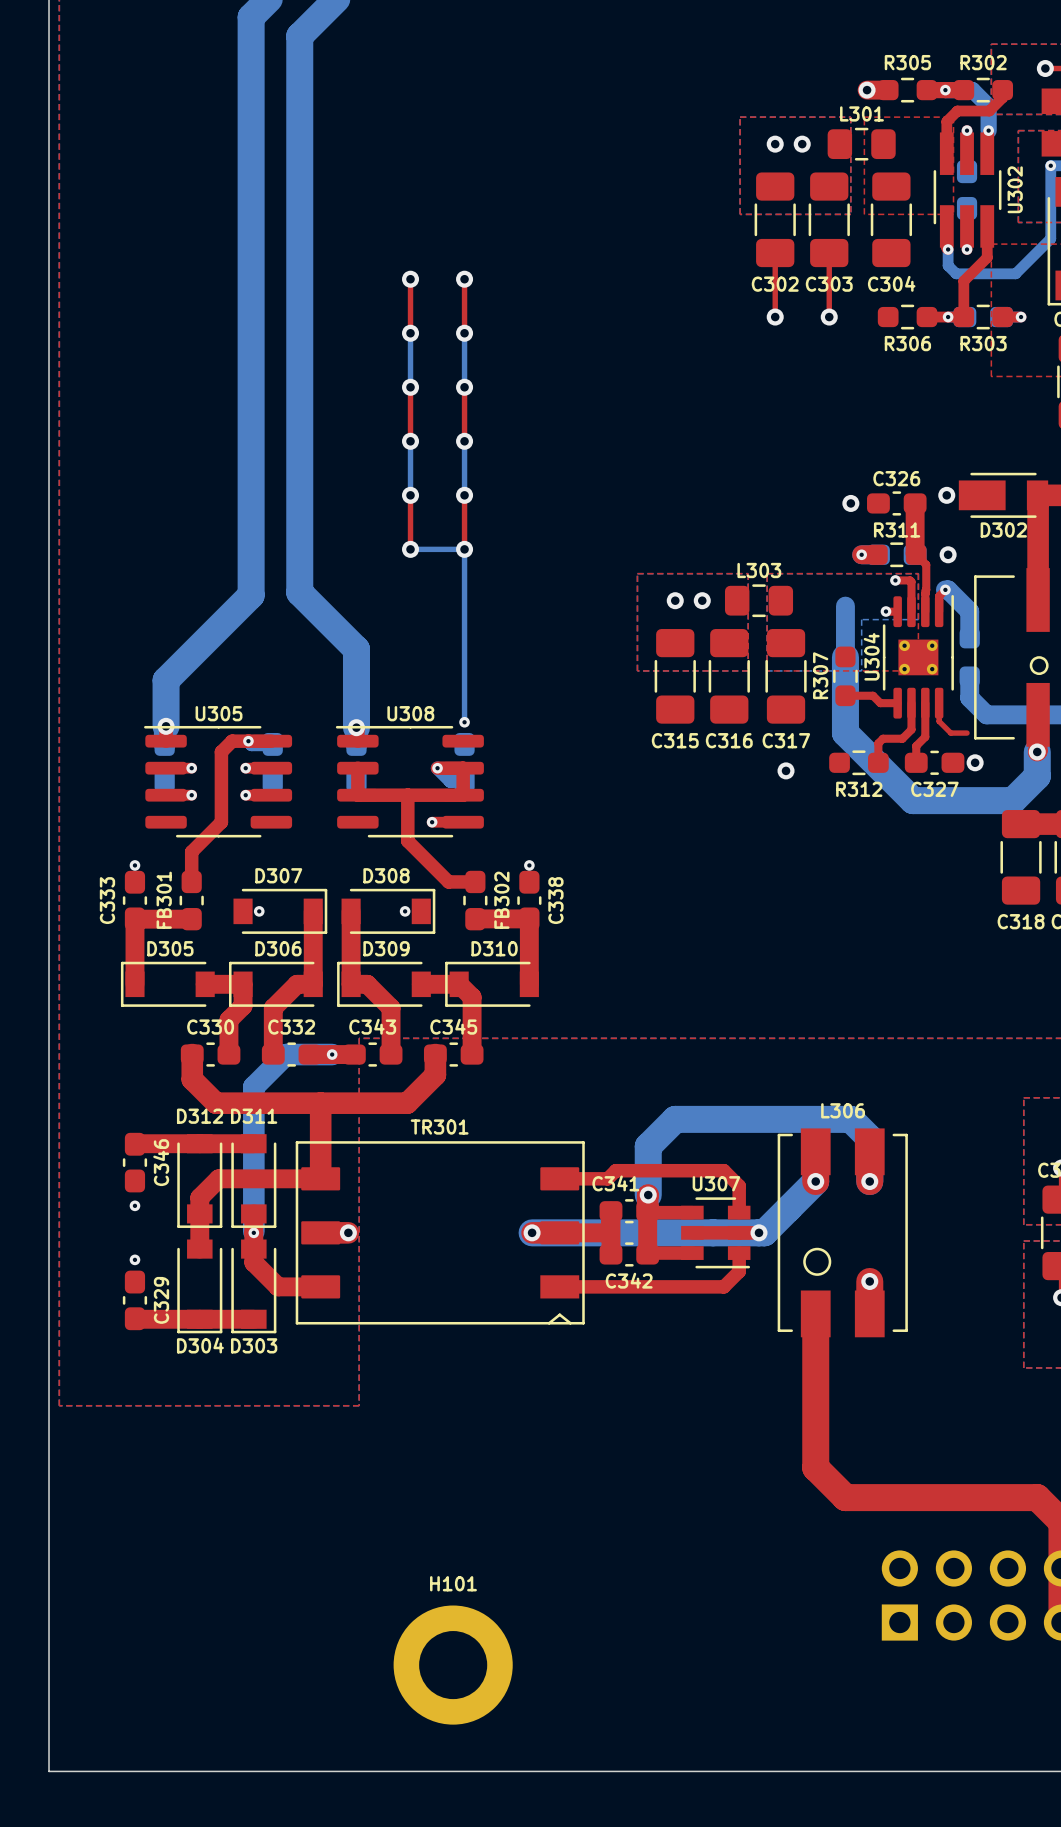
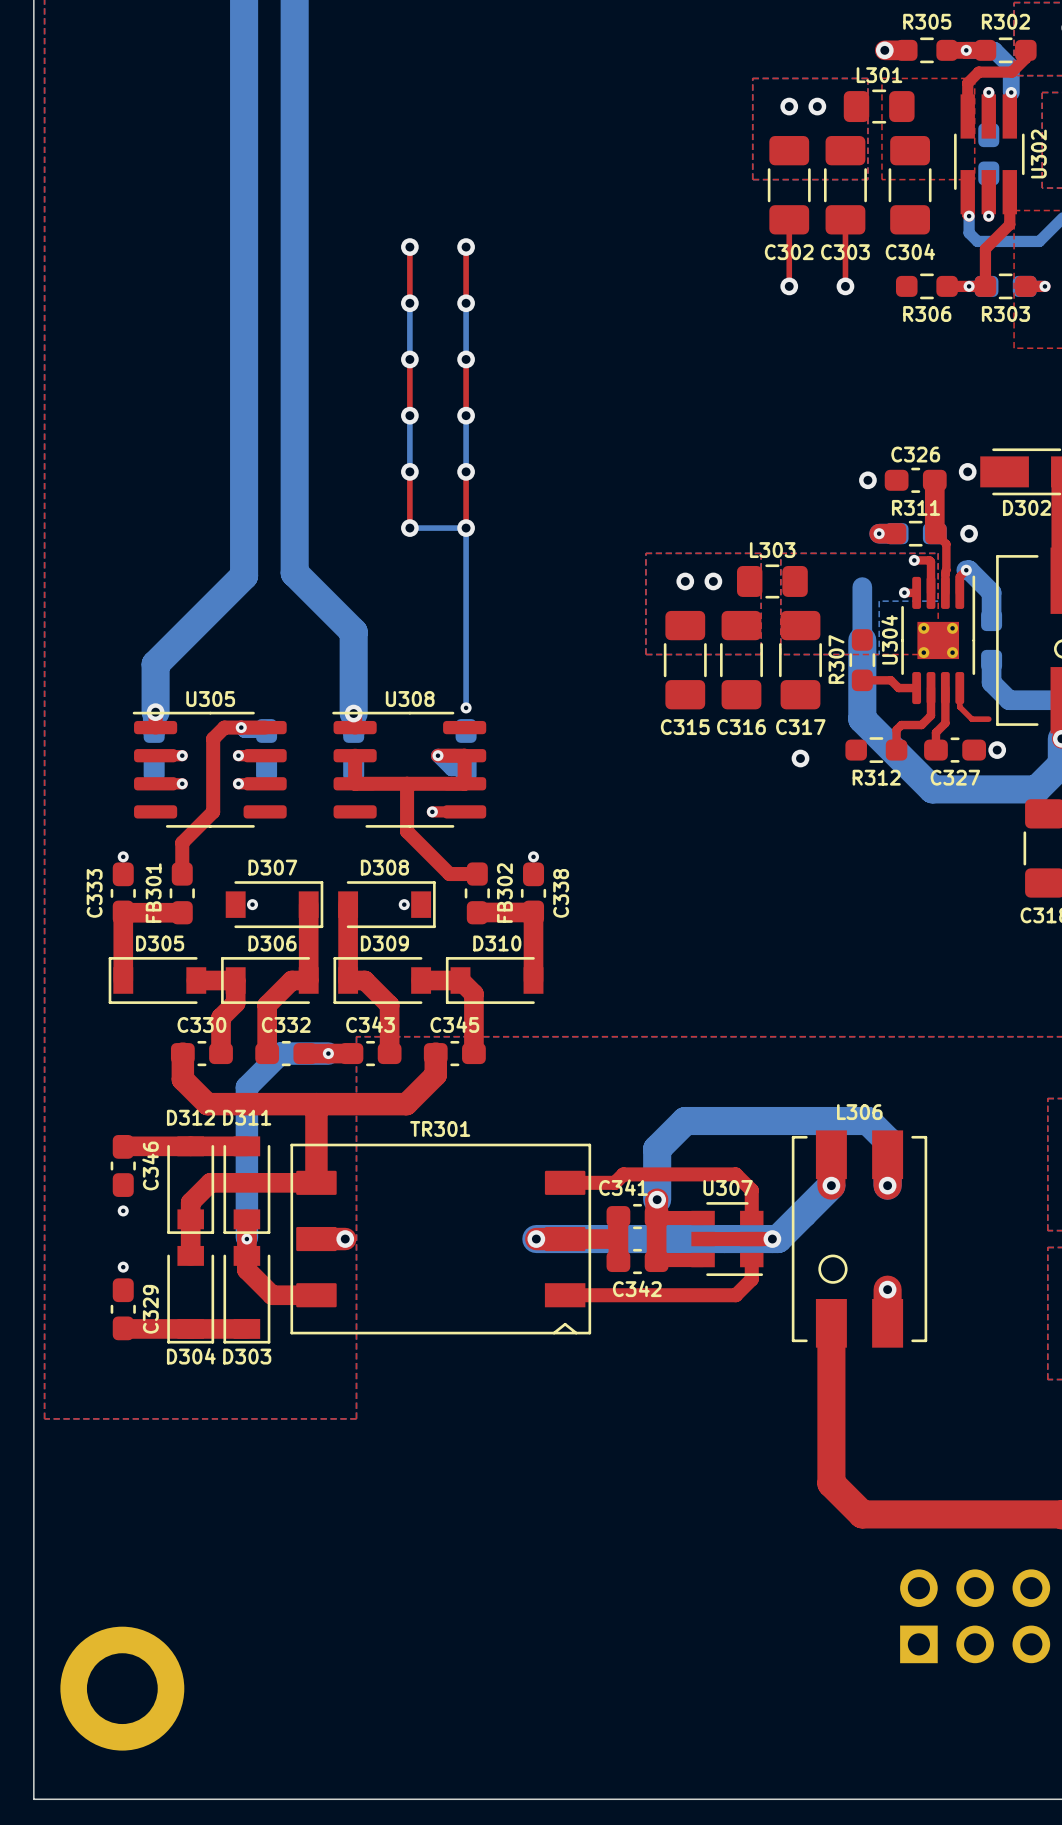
part: none -> (122, 1688)
H101: (453, 1665) -> none

